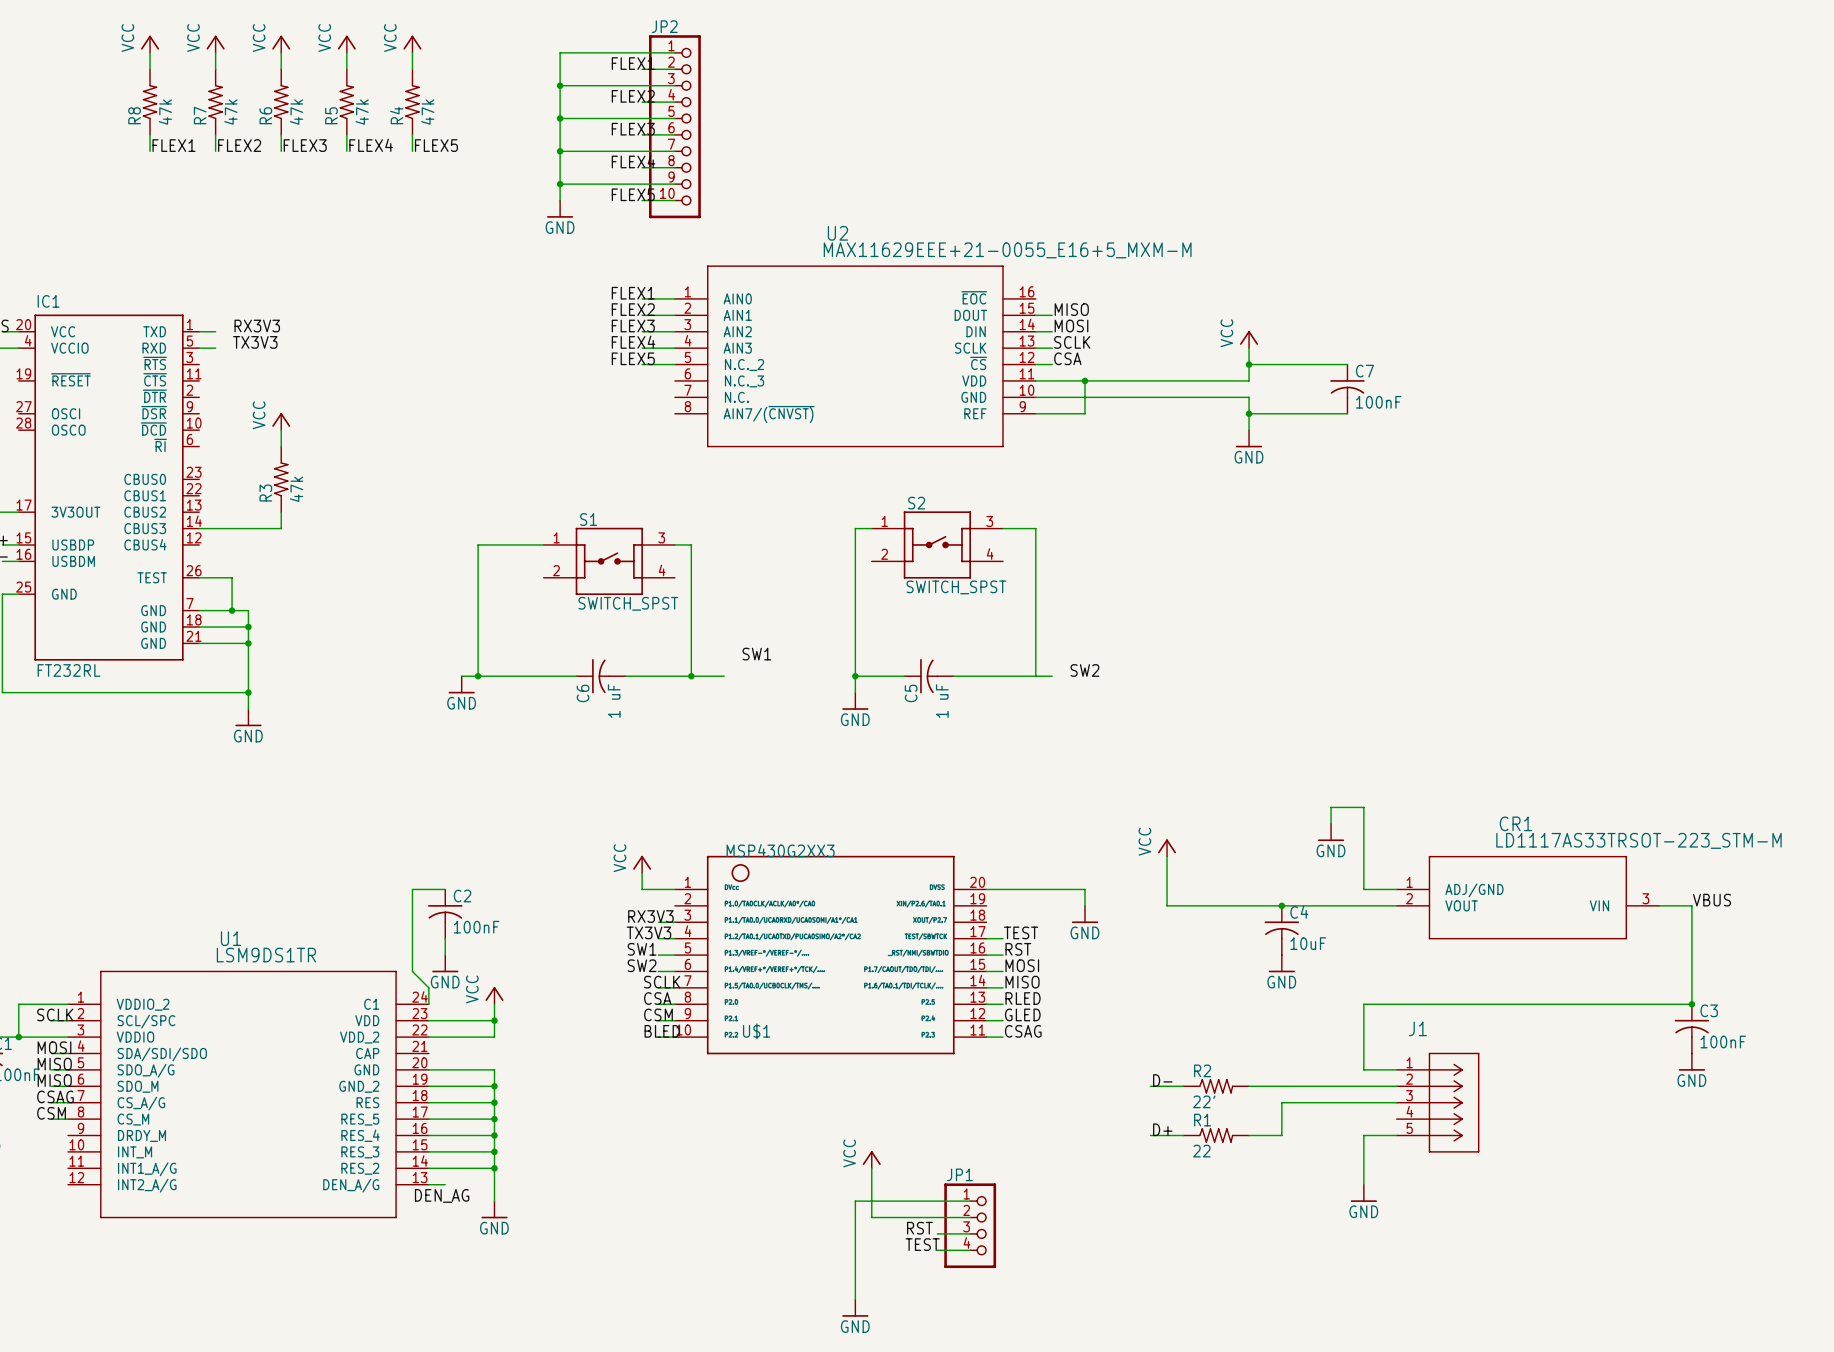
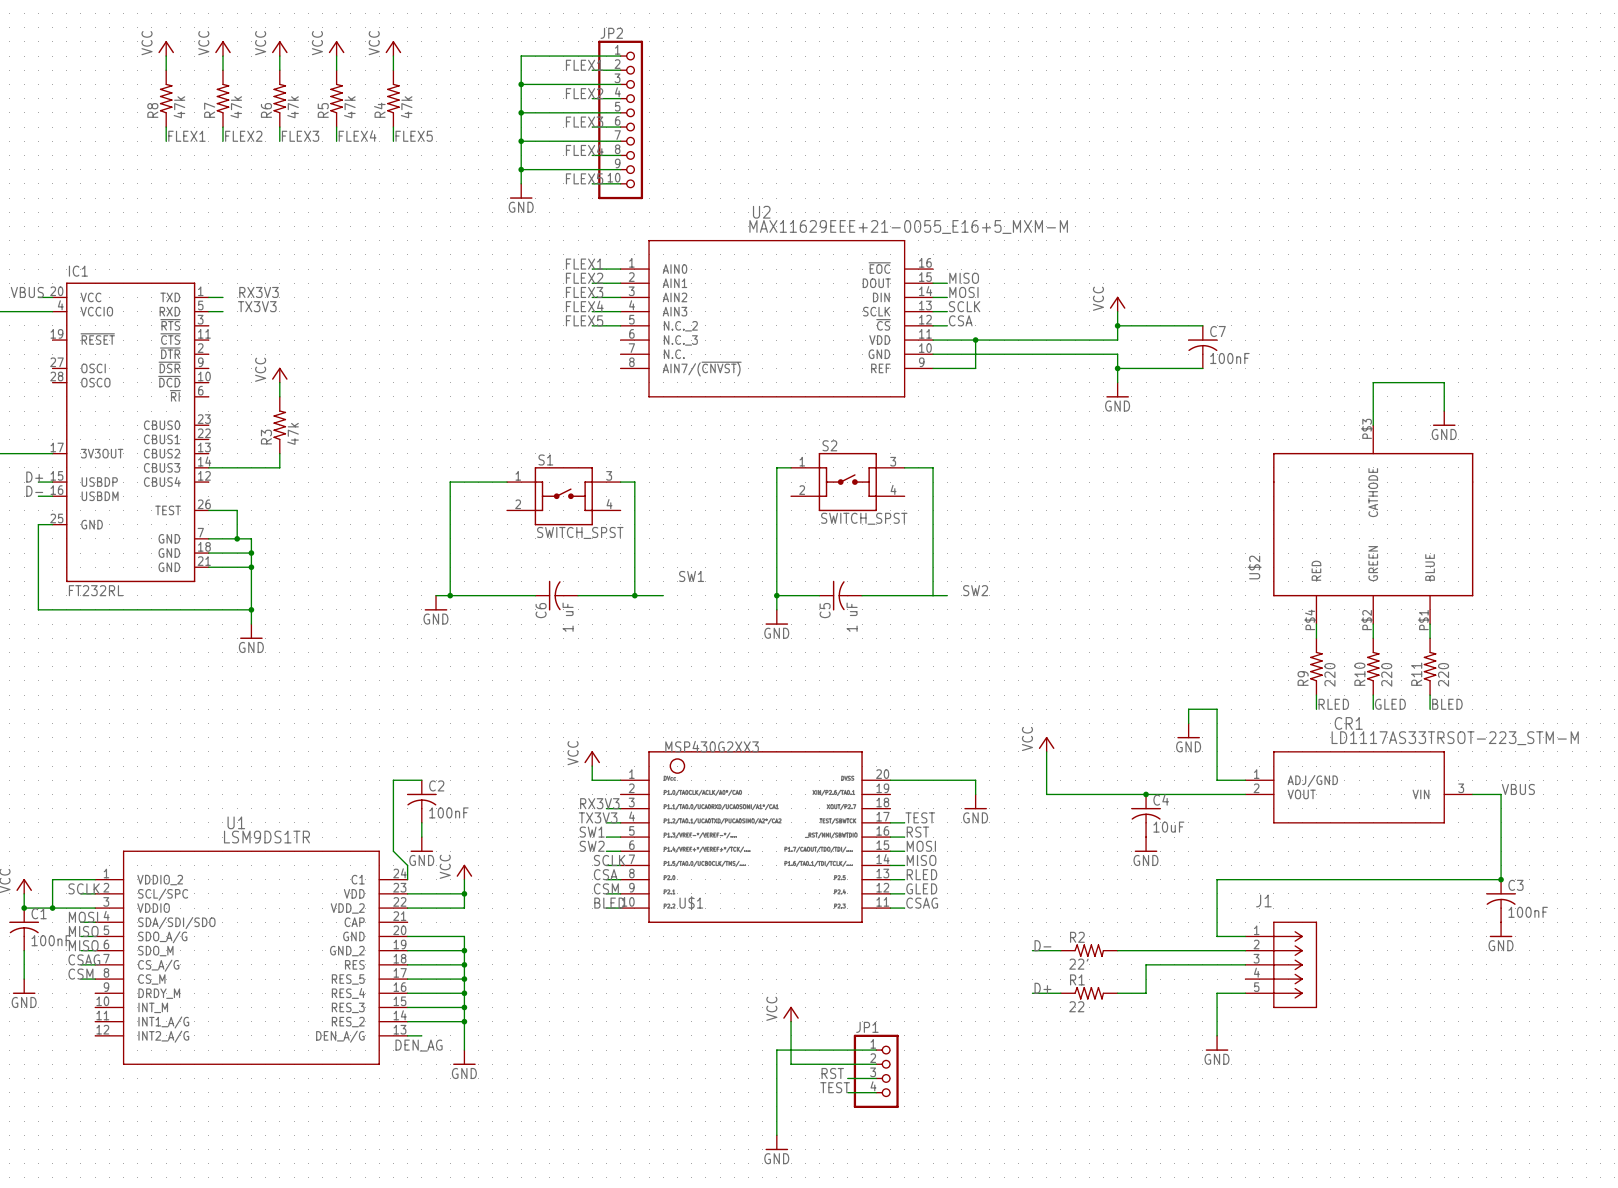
wire: none -> (1444, 411) (1444, 382) (1373, 382) (1373, 425)
power symbol: none -> GND (1444, 418)
U$2: none -> (1373, 524)
wire: none -> (1316, 624) (1316, 638)
wire: none -> (1373, 624) (1373, 638)
wire: none -> (1430, 624) (1430, 638)
R9: none -> 220 (1316, 666)
R10: none -> 220 (1373, 666)
R11: none -> 220 (1430, 666)
wire: none -> (1316, 695) (1316, 709)
wire: none -> (1373, 695) (1373, 709)
wire: none -> (1430, 695) (1430, 709)
label: none -> RLED (1333, 704)
label: none -> GLED (1390, 704)
label: none -> BLED (1447, 704)

